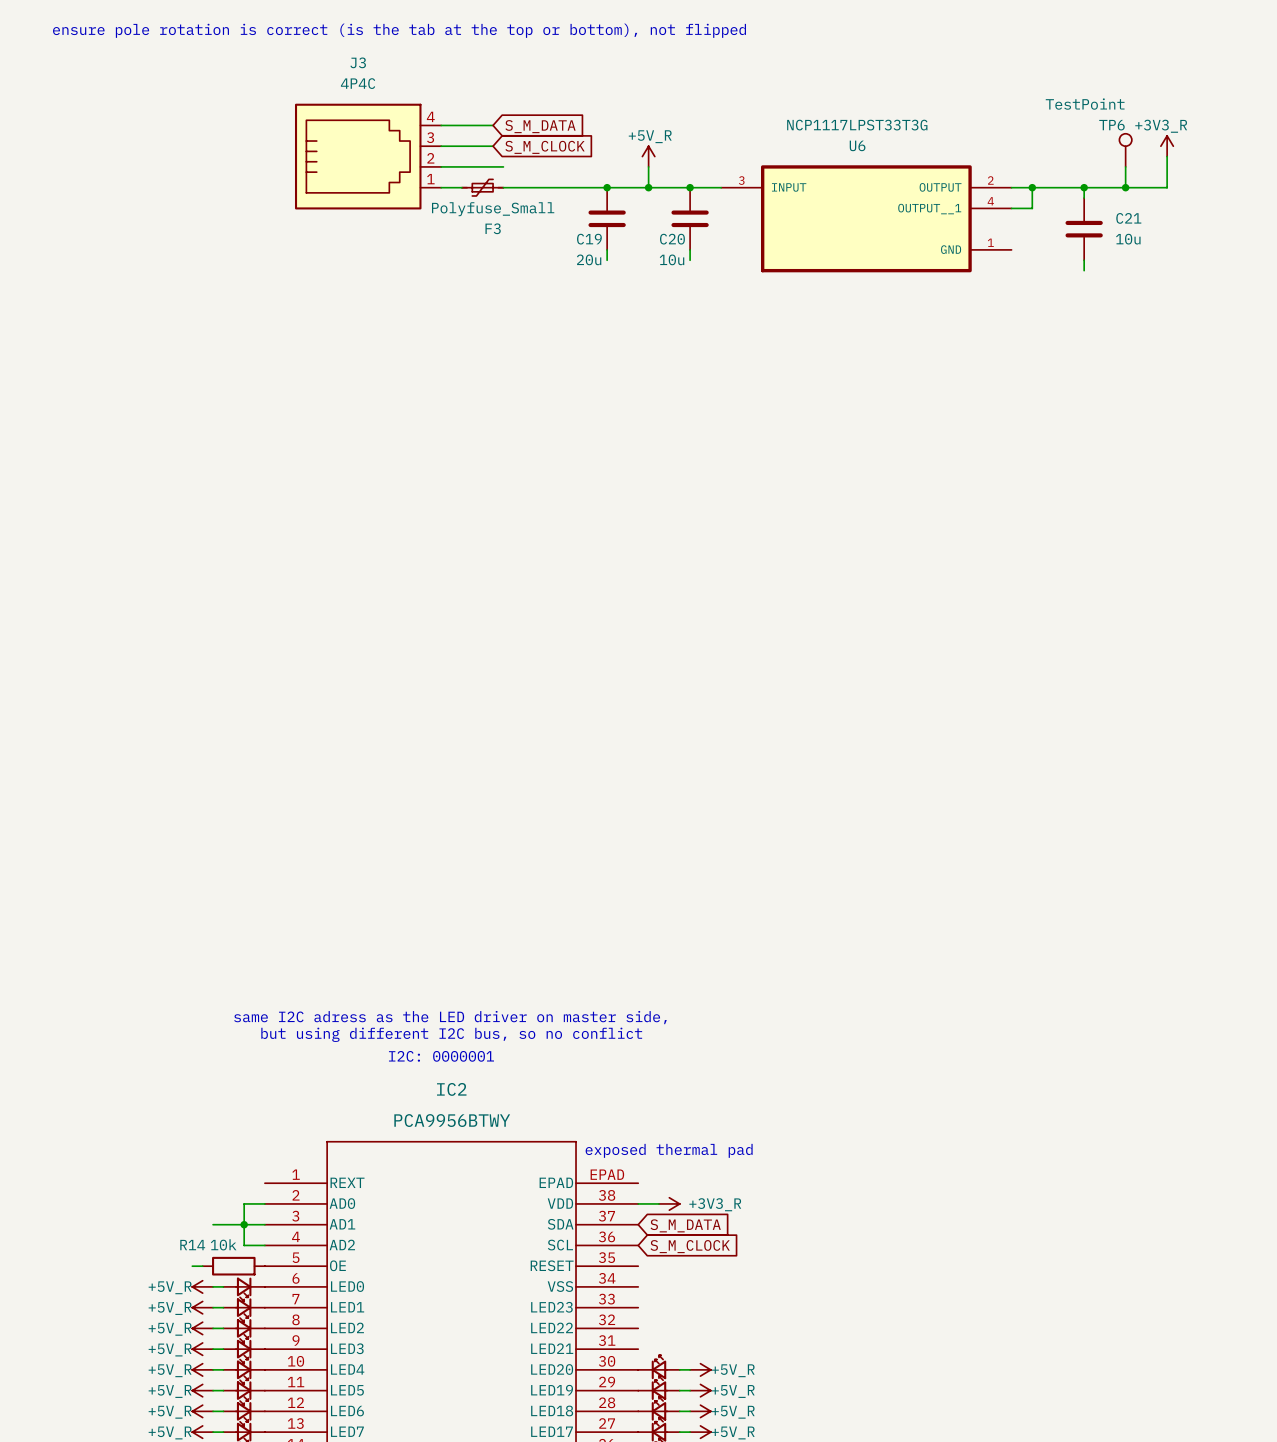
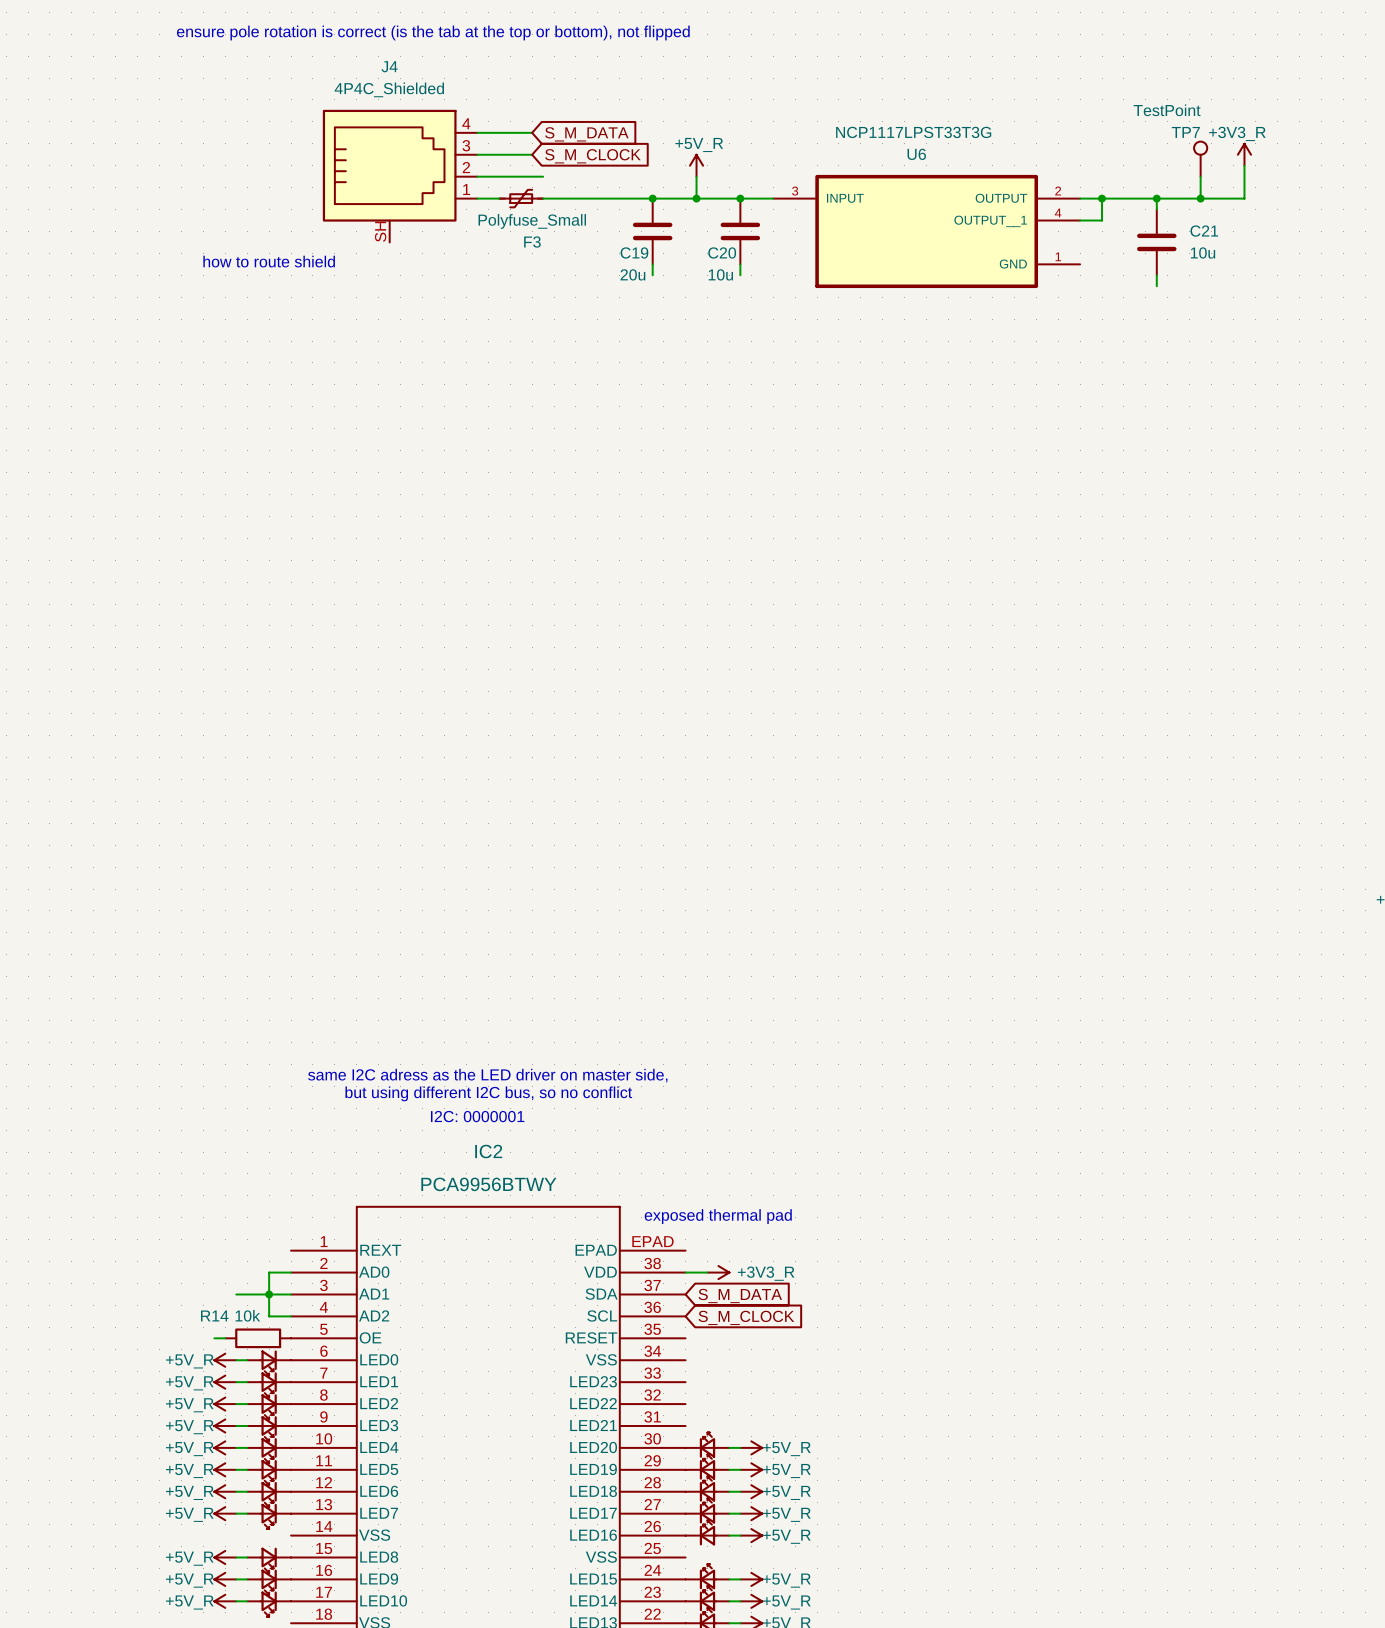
TP6 name: TP6 (1111, 125) -> TP7 (1185, 132)
J3: 4P4C (368, 156) -> none
J4: none -> 4P4C_Shielded (400, 176)
text: none -> how to route shield (269, 261)

